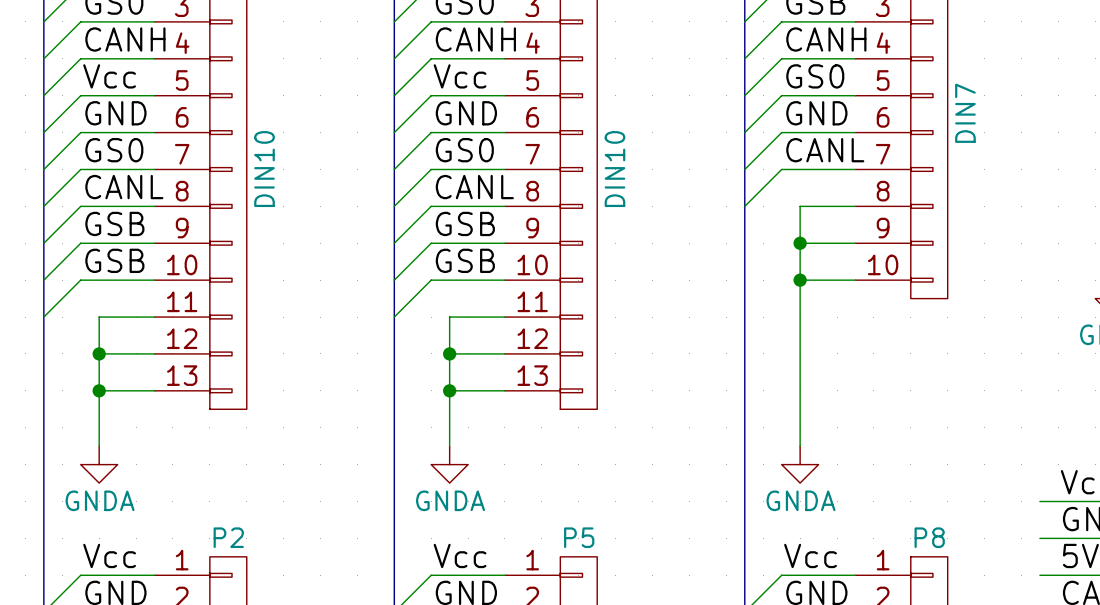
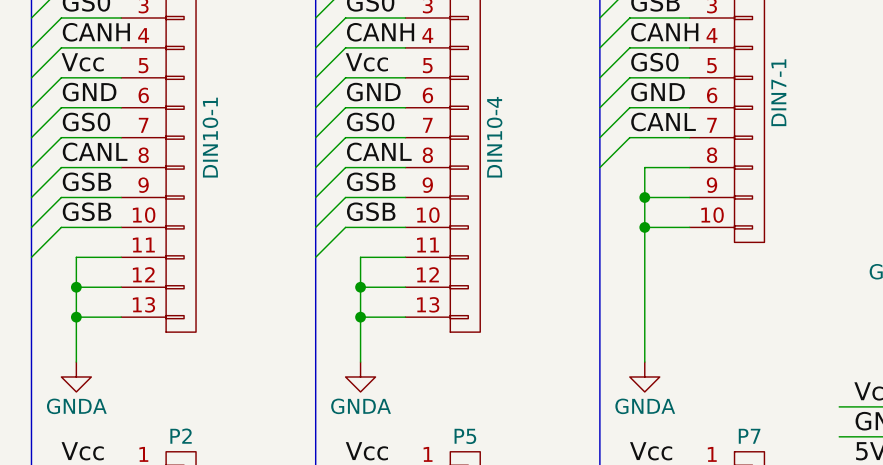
part value: DIN7 (965, 113) -> DIN7-1 (778, 92)
part value: DIN10 (264, 169) -> DIN10-1 (210, 137)
part value: DIN10 (614, 169) -> DIN10-4 (494, 137)
P8 name: P8 (929, 537) -> P7 (749, 436)

